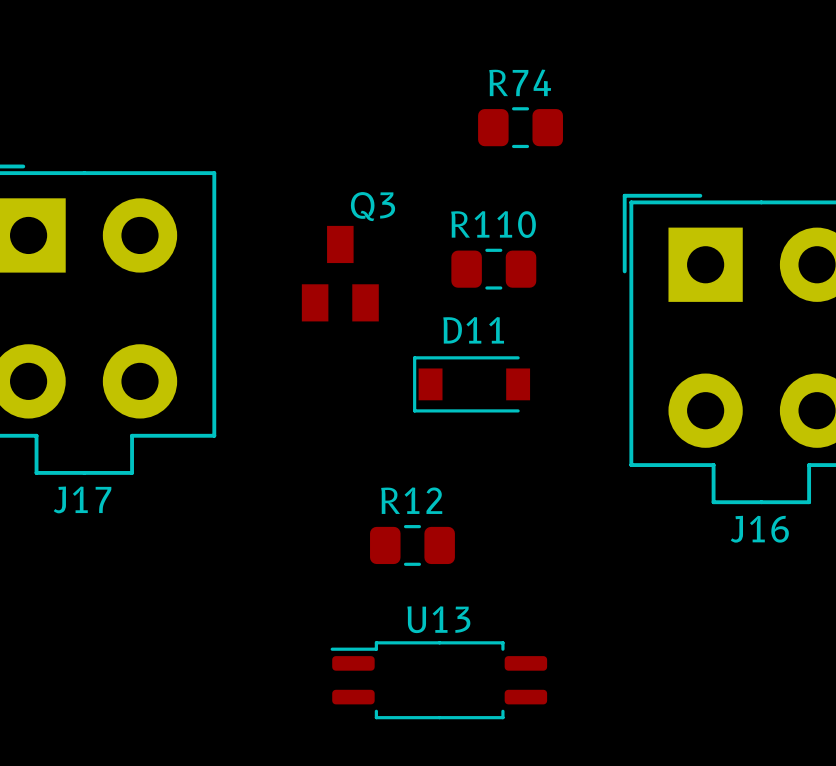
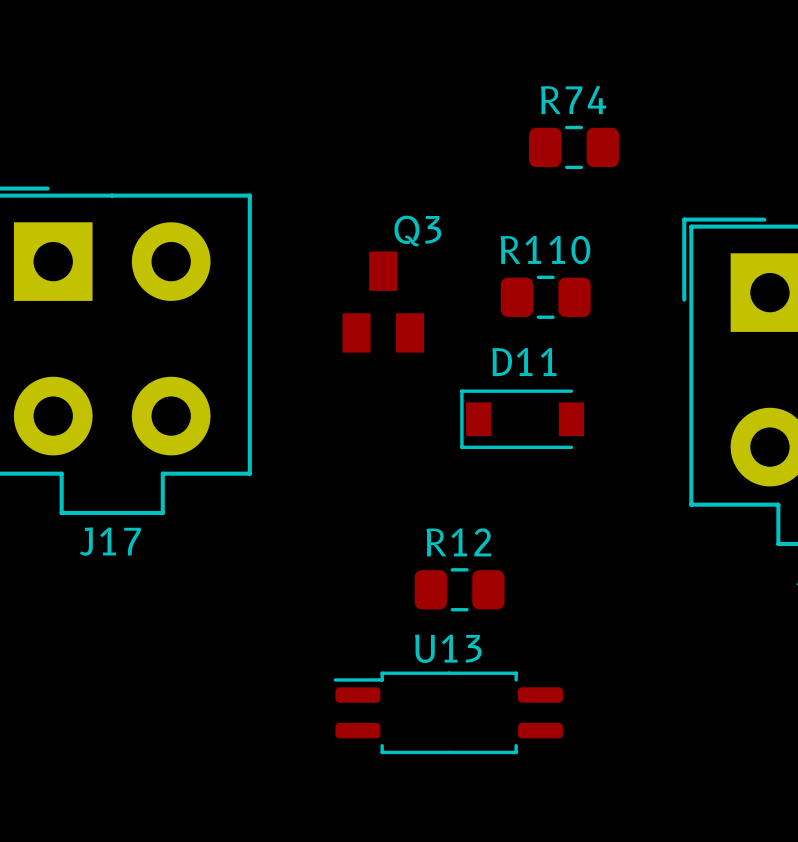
U13 position: (438, 680) -> (448, 712)

